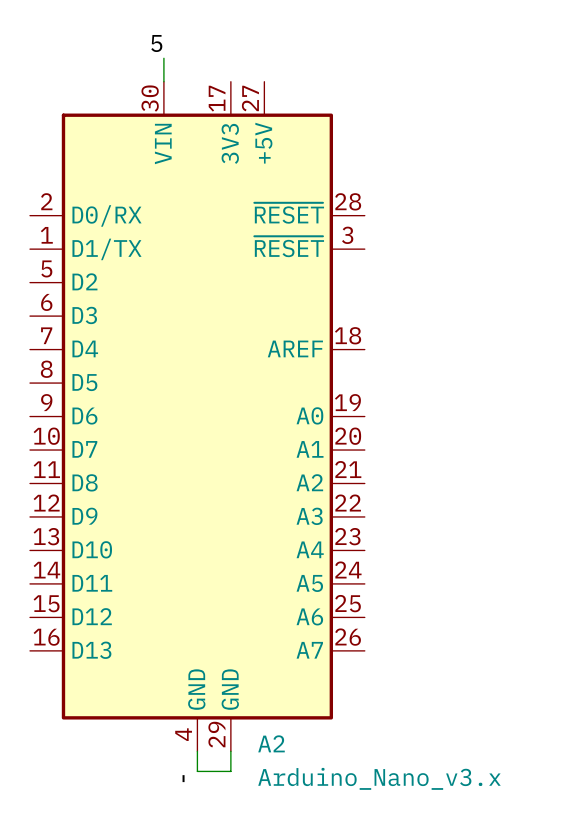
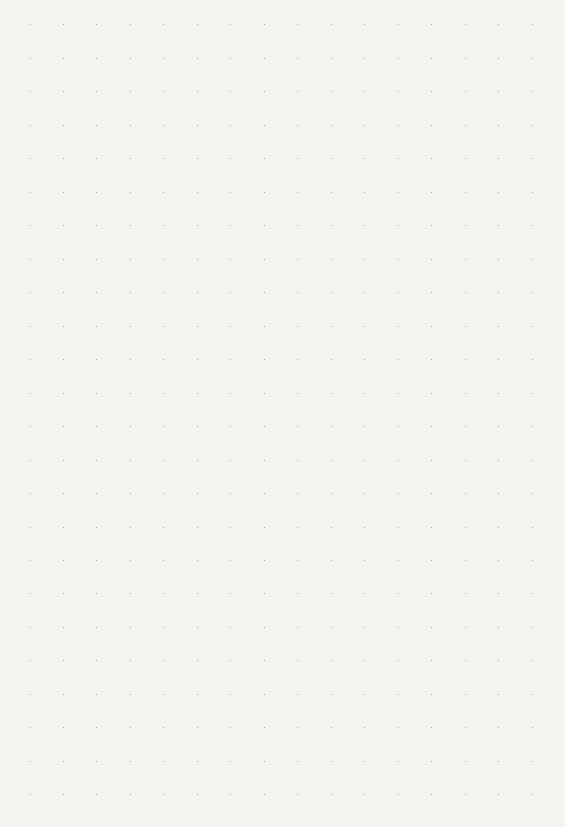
label: 5 (156, 43) -> none
wire: (163, 58) (163, 81) -> none
A2: Arduino_Nano_v3.x (197, 416) -> none
wire: (197, 751) (197, 771) (230, 771) (230, 751) -> none
label: - (183, 778) -> none

